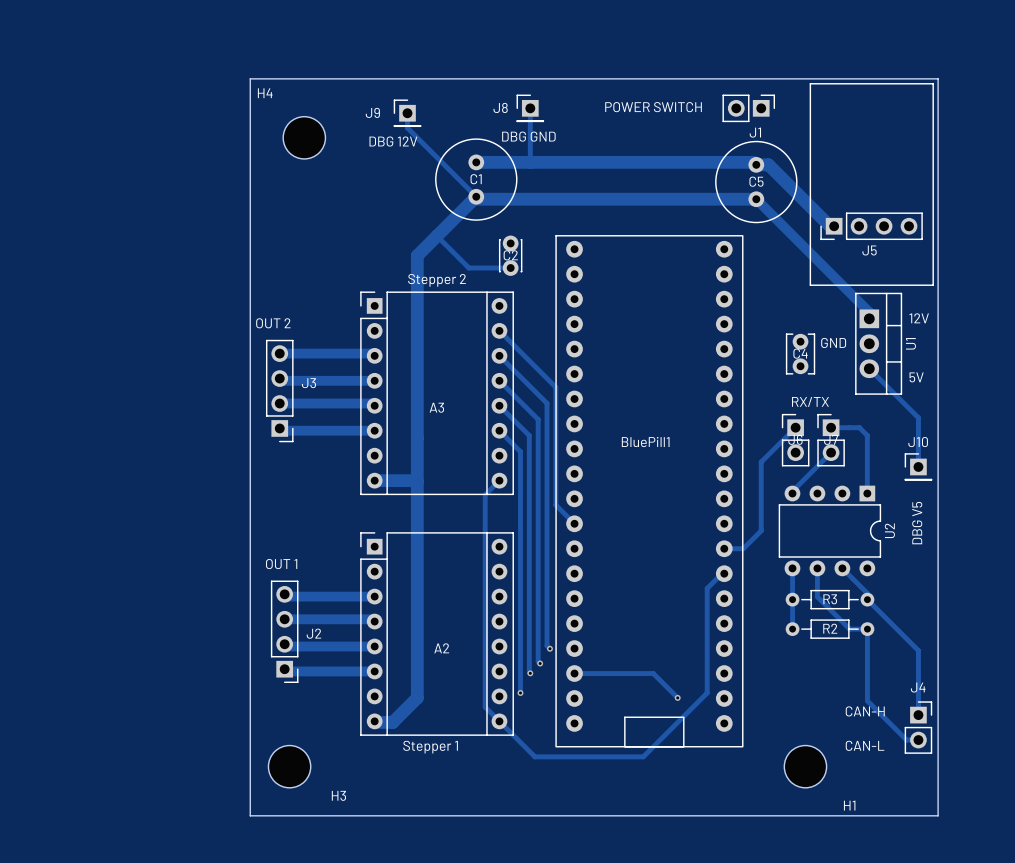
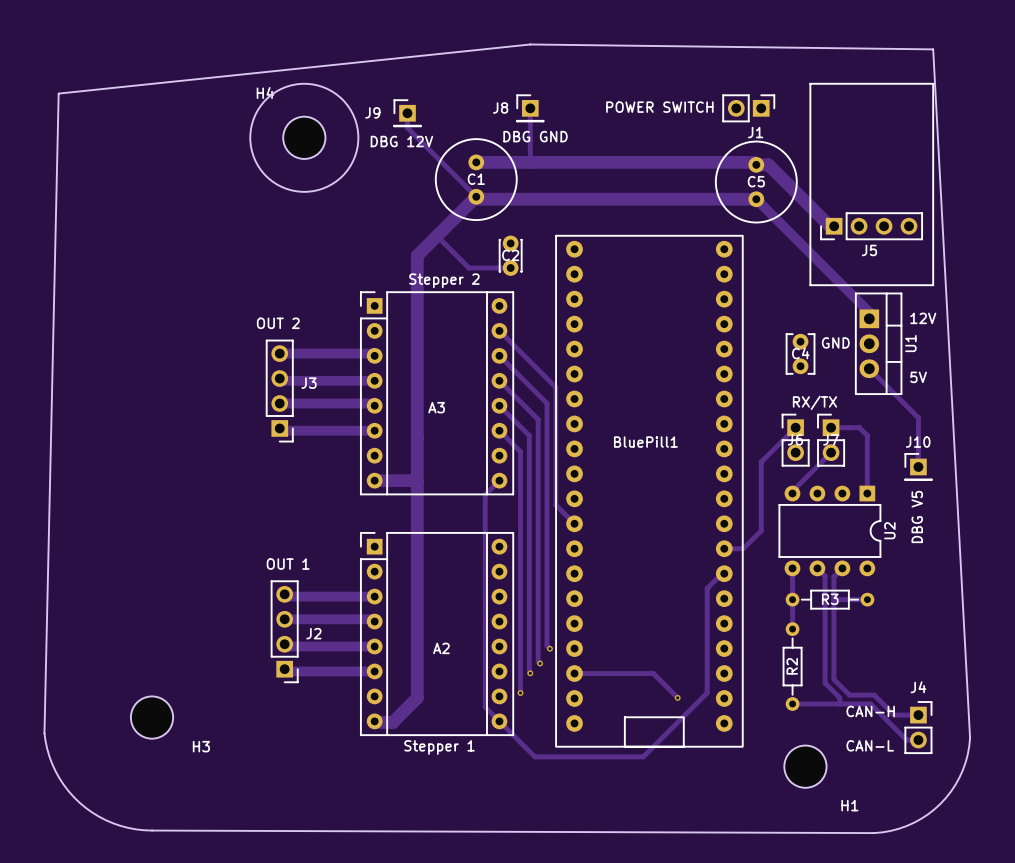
board edge: (250, 78) (938, 78) (938, 815) (250, 815) (250, 78) -> (530, 44) (58, 93) (44, 733) (49, 756) (59, 778) (73, 797) (98, 816) (128, 827) (152, 830) (874, 833) (898, 828) (920, 819) (940, 803) (955, 784) (965, 762) (970, 738) (933, 49) (530, 44)
round board edge: none -> [250, 83, 359, 193]
track: (817, 568) (817, 596) (849, 629) (867, 629) (867, 700) (870, 703) -> (817, 568) (825, 576) (825, 683) (839, 697) (839, 703)
track: (842, 568) (867, 593) (867, 599) (918, 650) (918, 715) -> (842, 568) (833, 576) (833, 679) (849, 695) (874, 695) (894, 715) (918, 715)
track: none -> (833, 599) (867, 599)
R2 rotation: 0° (830, 629) -> 90° clockwise (792, 666)
track: none -> (792, 703) (870, 703)
H3 position: (289, 766) -> (152, 717)

